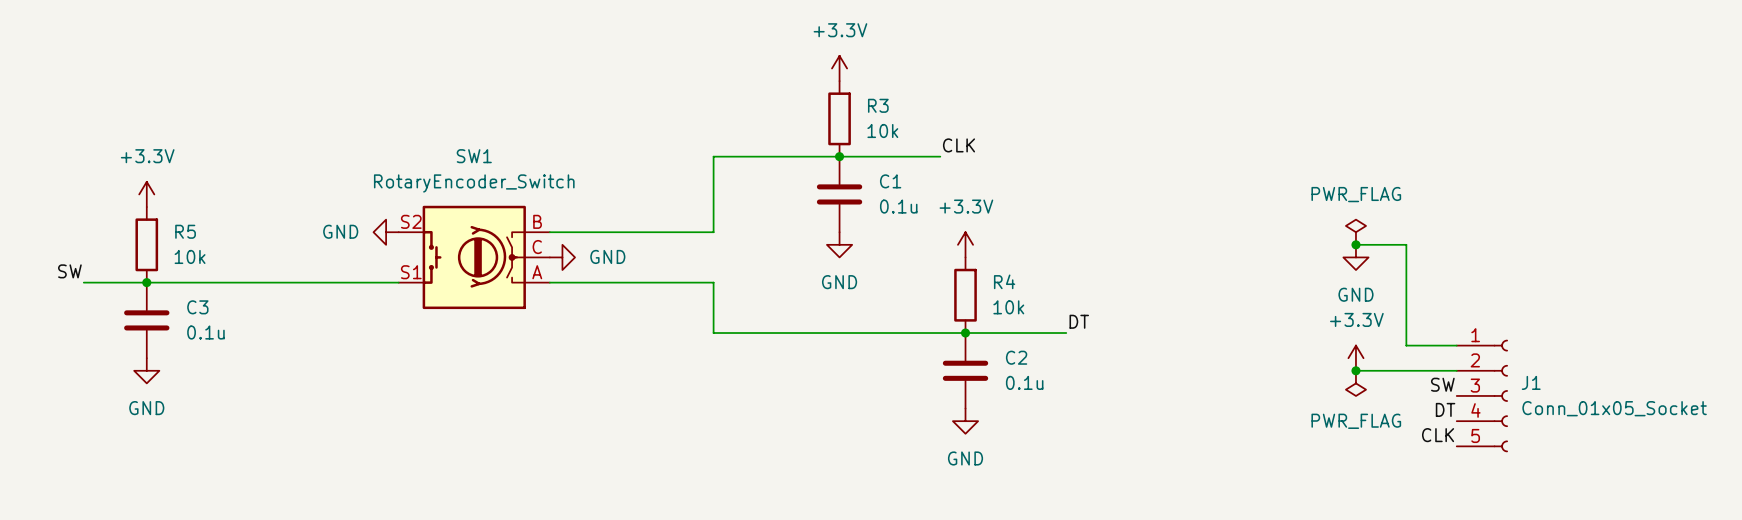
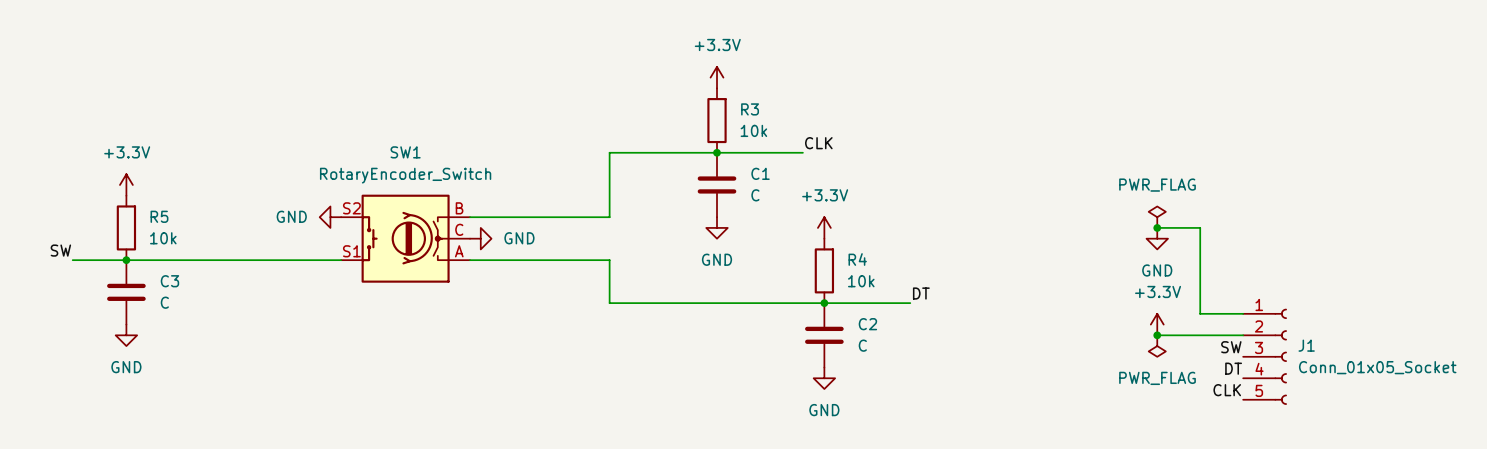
C1 value: 0.1u (898, 206) -> C (755, 195)
C3 value: 0.1u (205, 332) -> C (164, 302)
C2 value: 0.1u (1024, 382) -> C (862, 345)

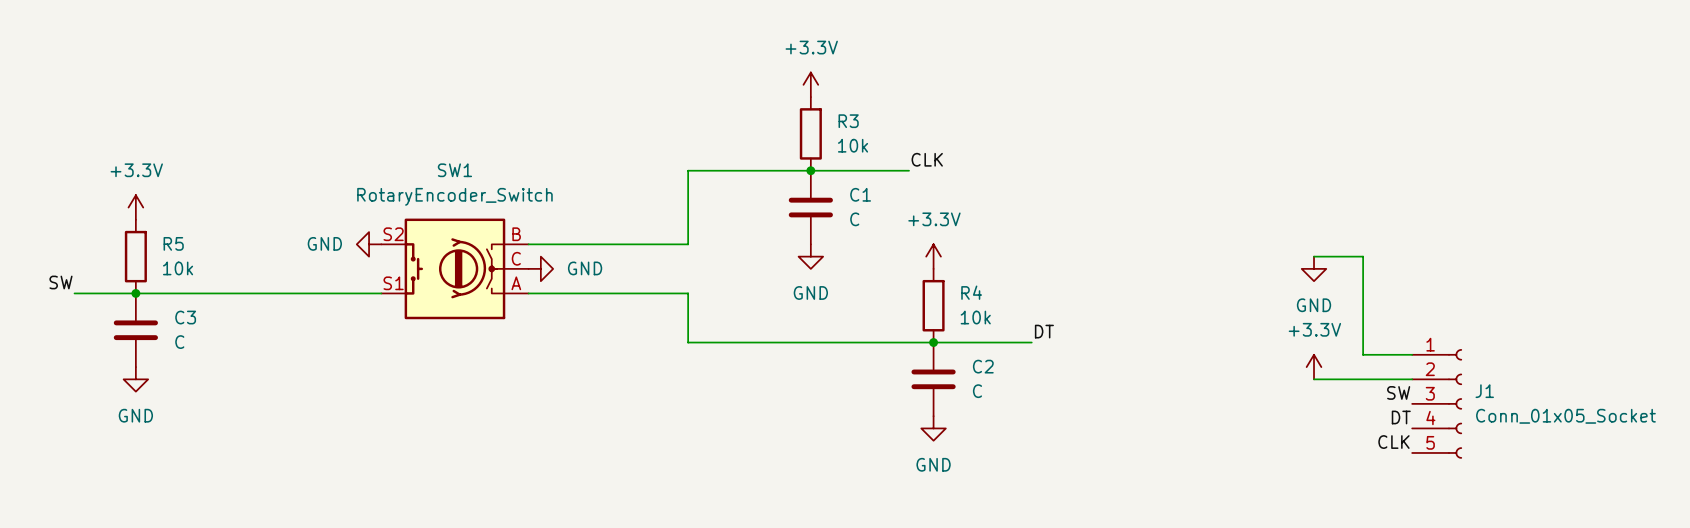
power symbol: PWR_FLAG (1157, 217) -> none
junction: (1157, 227) -> none
junction: (1157, 335) -> none
power symbol: PWR_FLAG (1157, 346) -> none

